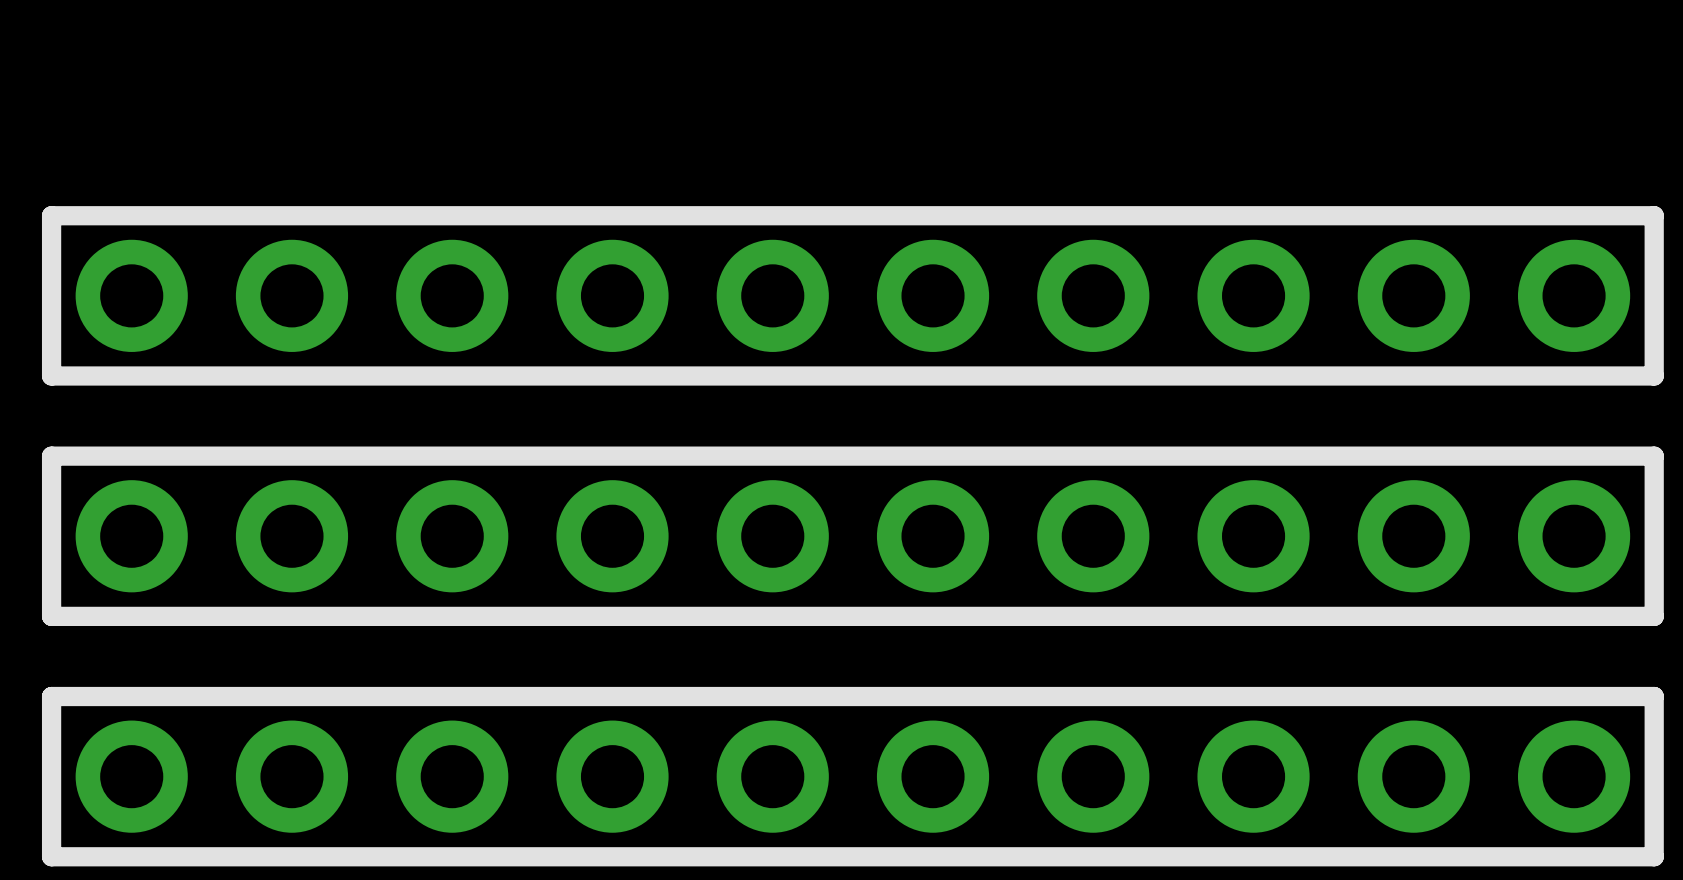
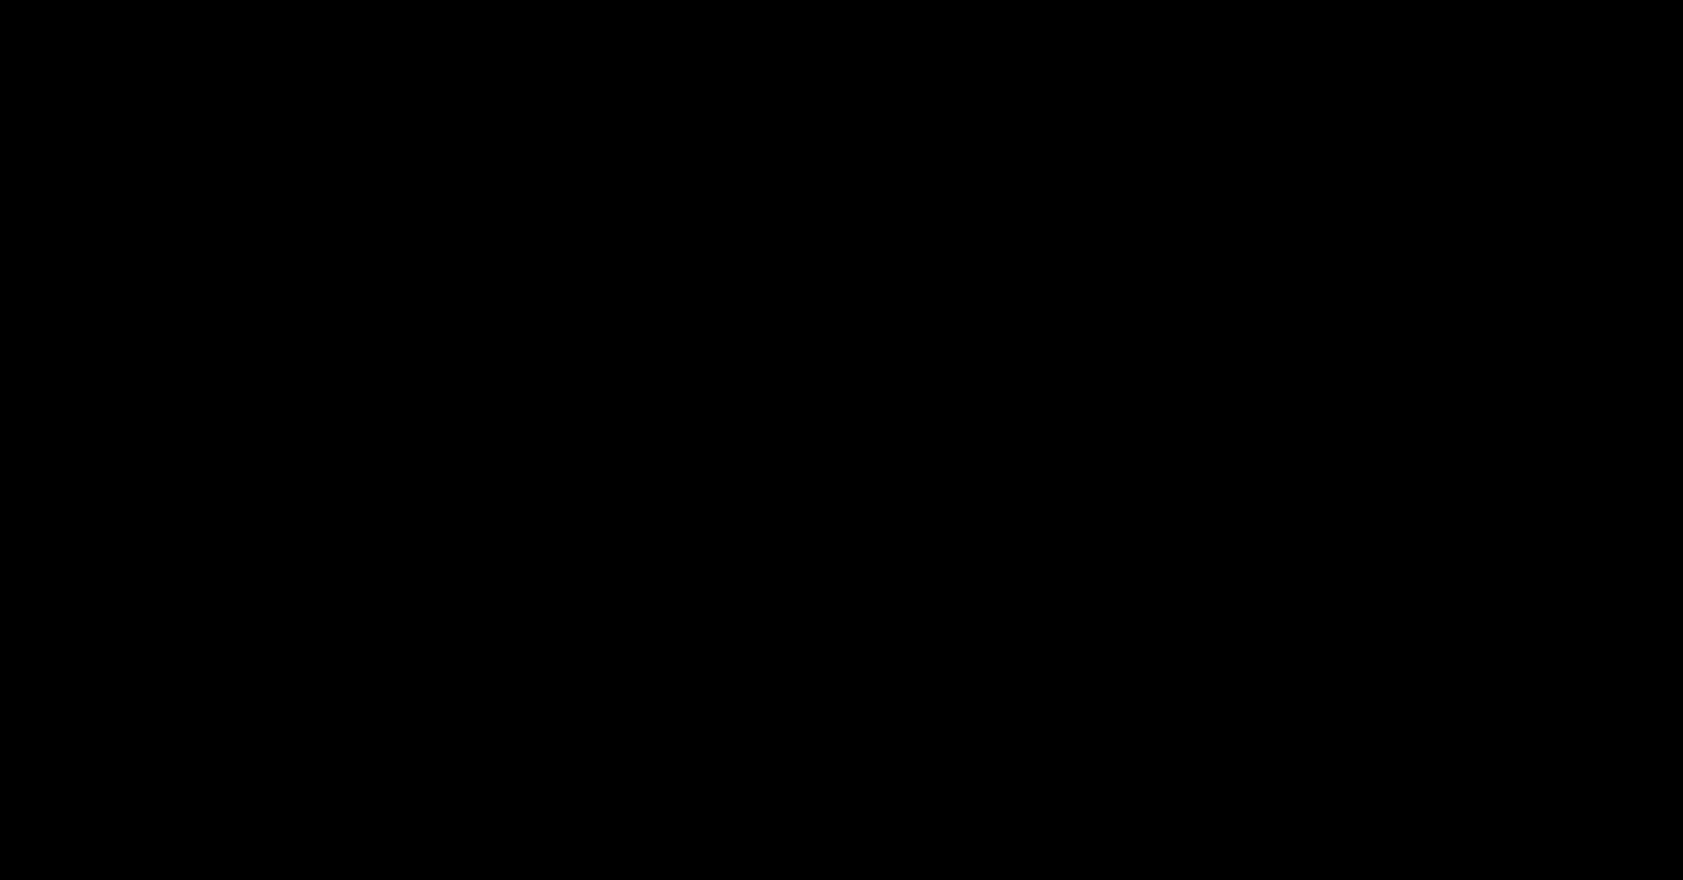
part: (852, 295) -> none
part: (852, 536) -> none
part: (852, 776) -> none

